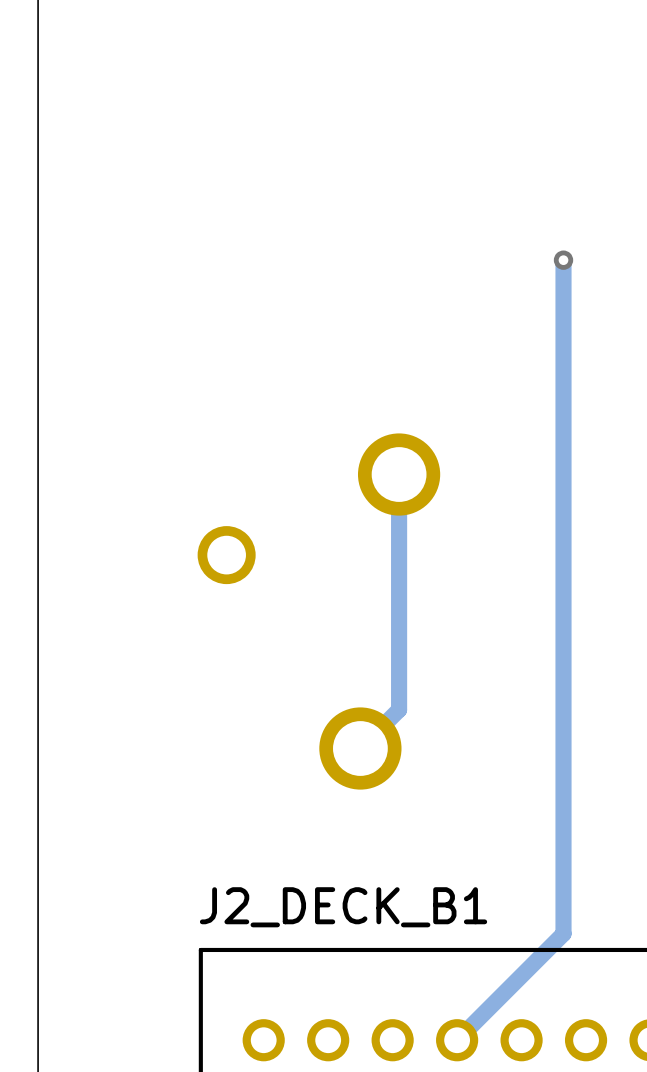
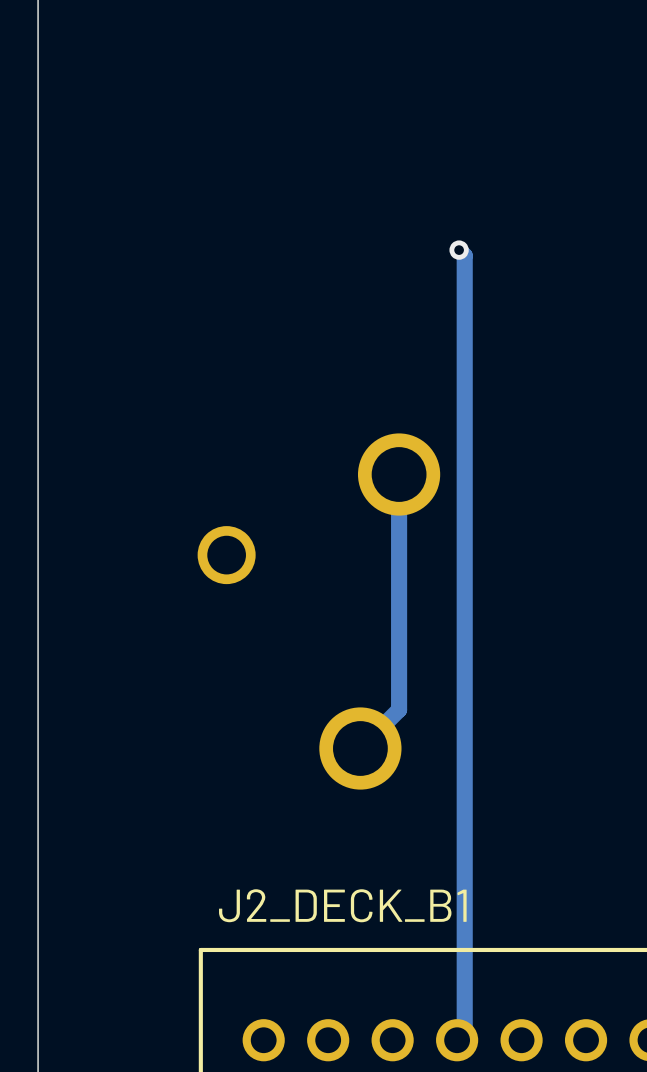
track: (563, 260) (563, 933) (464, 1032) -> (459, 250) (464, 255) (464, 1032)
via position: (563, 260) -> (459, 250)

